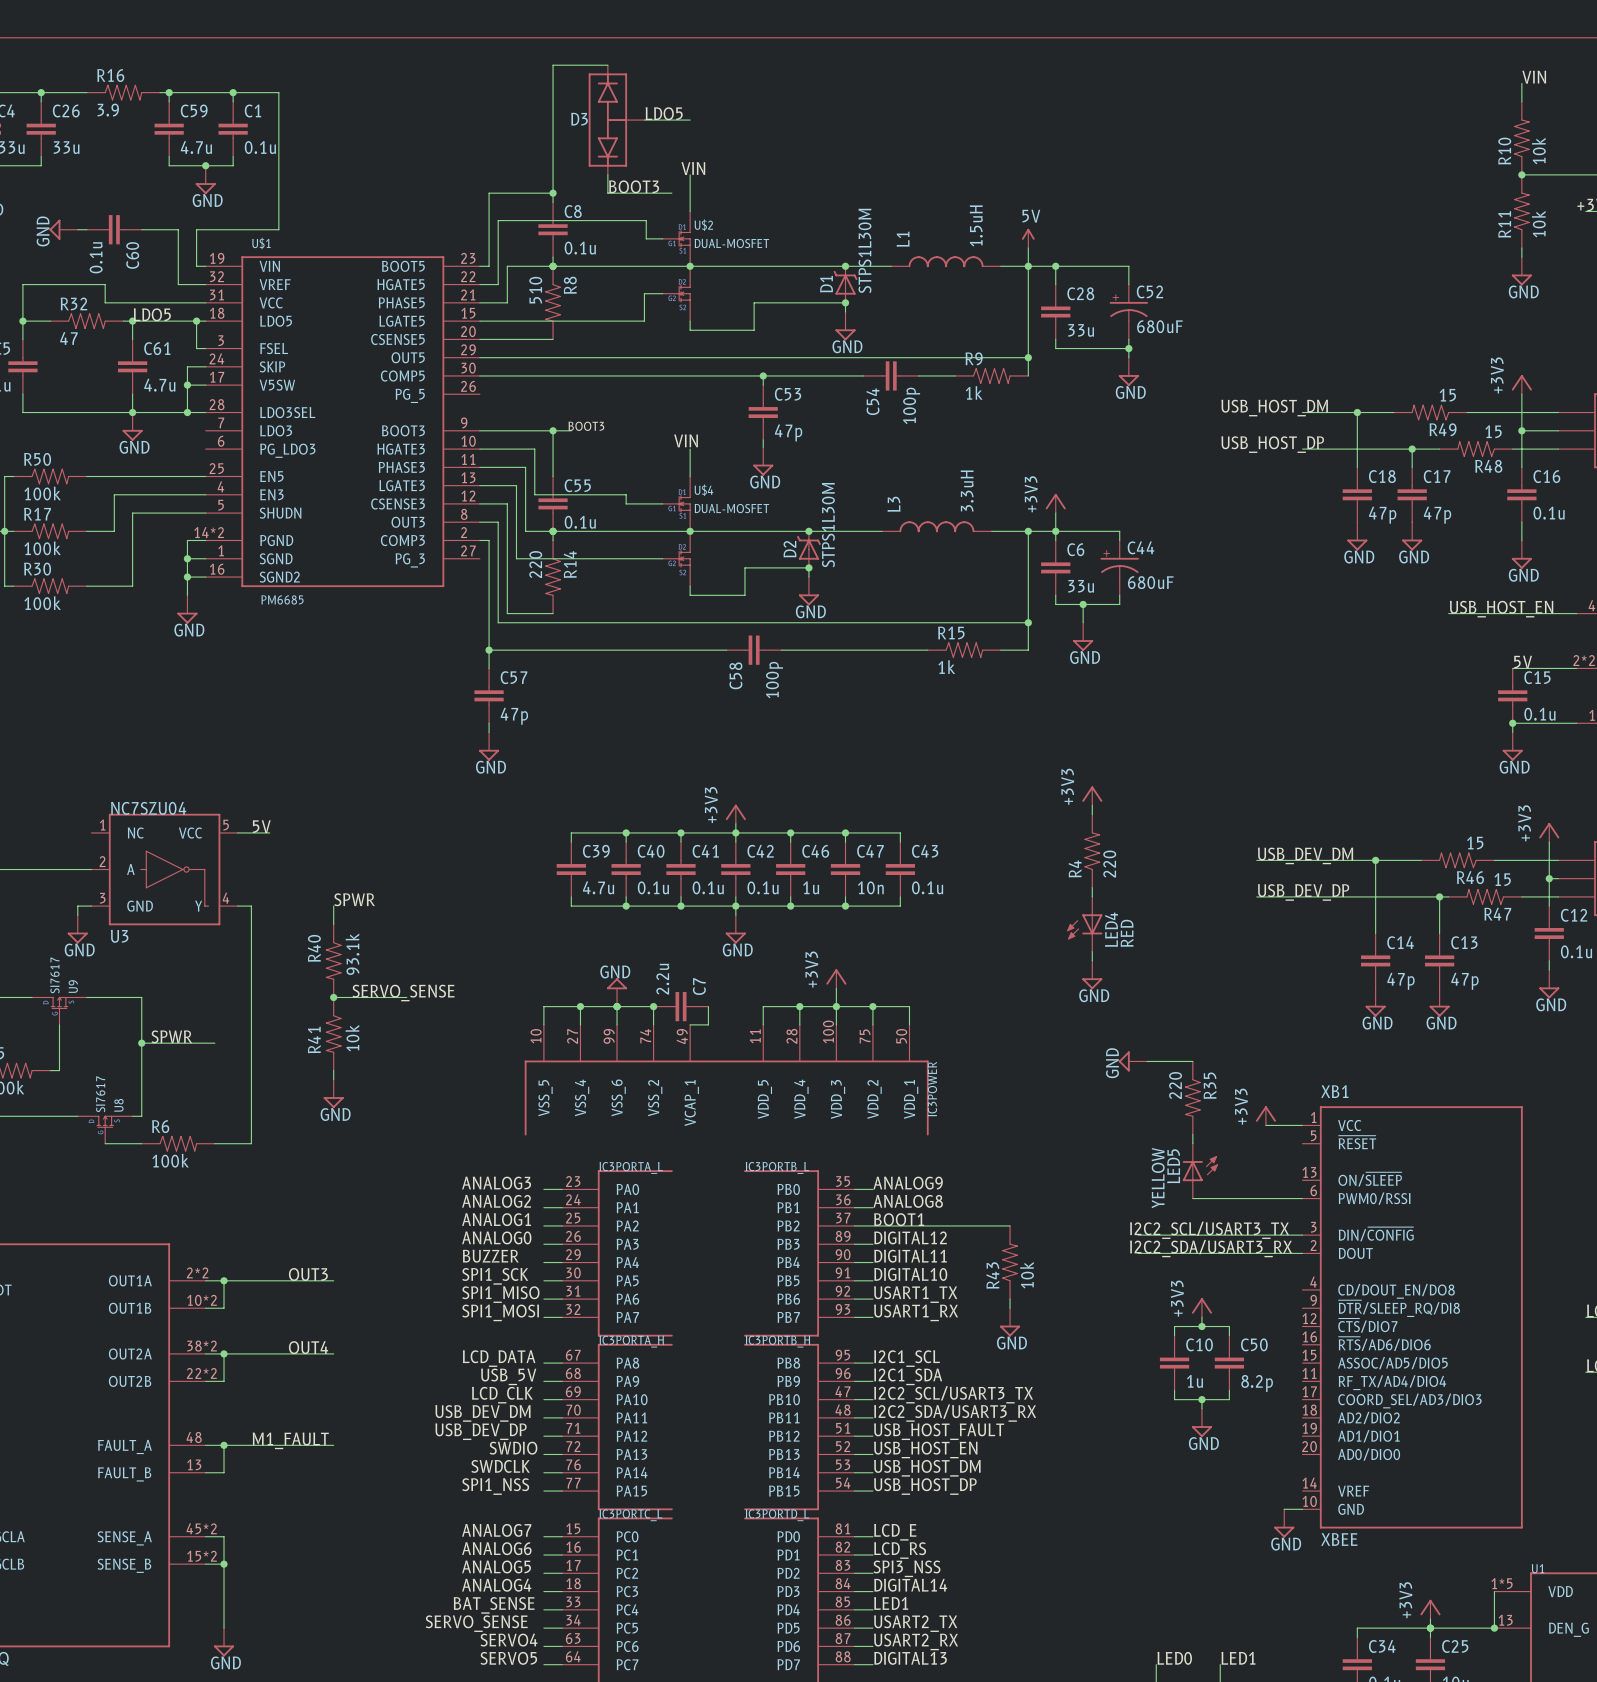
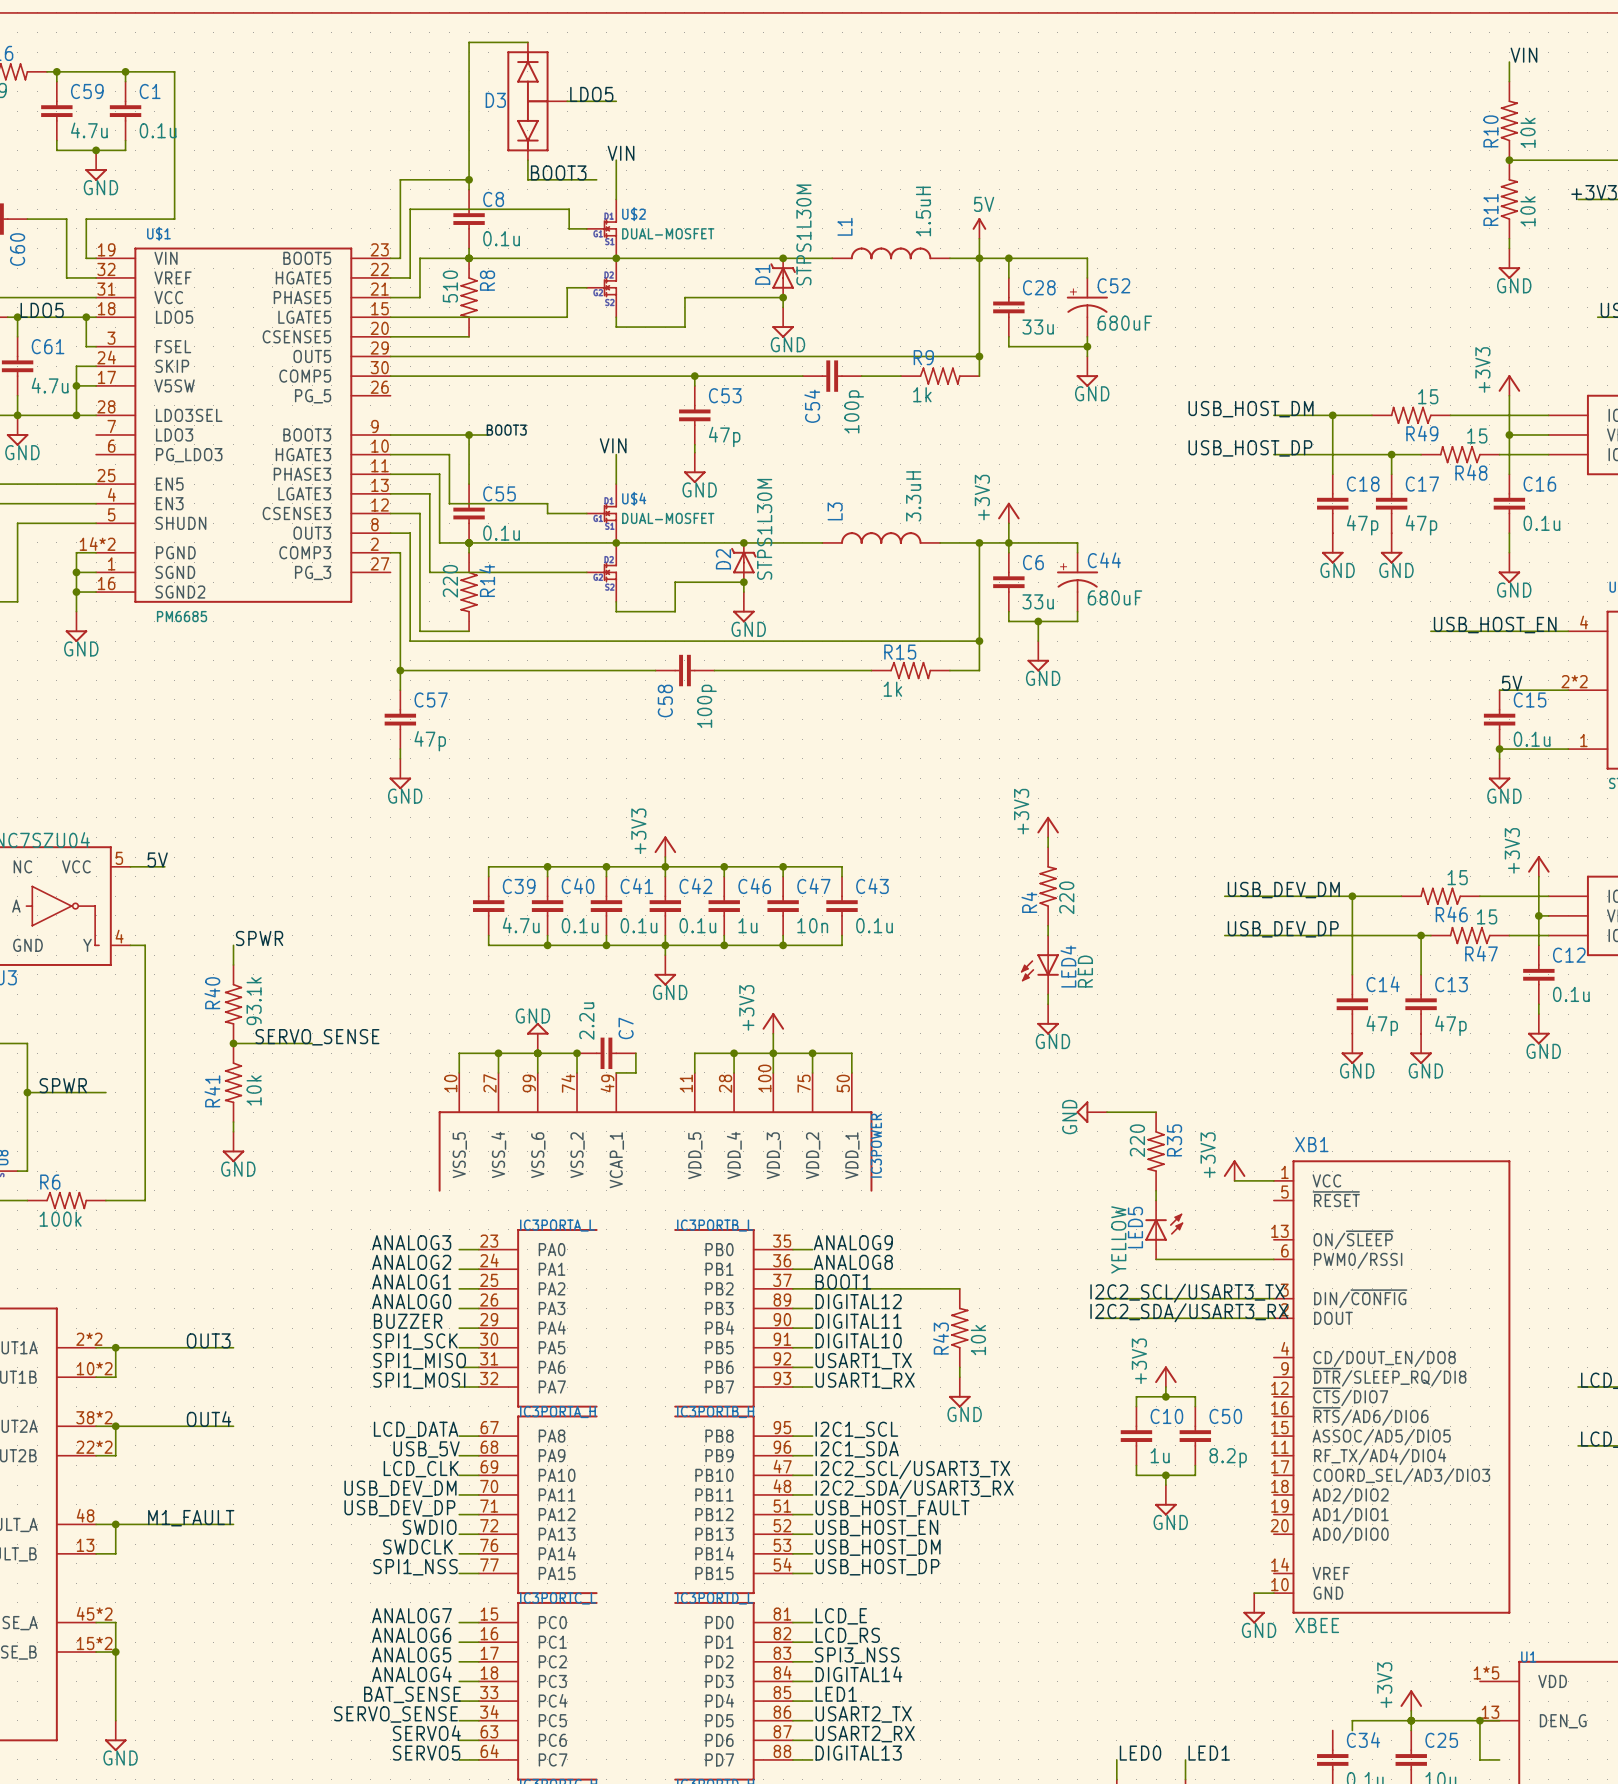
wire: (1494, 1591) (1494, 1628) -> none
wire: (1375, 1628) (1357, 1628) (1357, 1637) -> (1352, 1720) (1352, 1730)
wire: none -> (1499, 1720) (1479, 1720) (1479, 1759) (1499, 1759)

